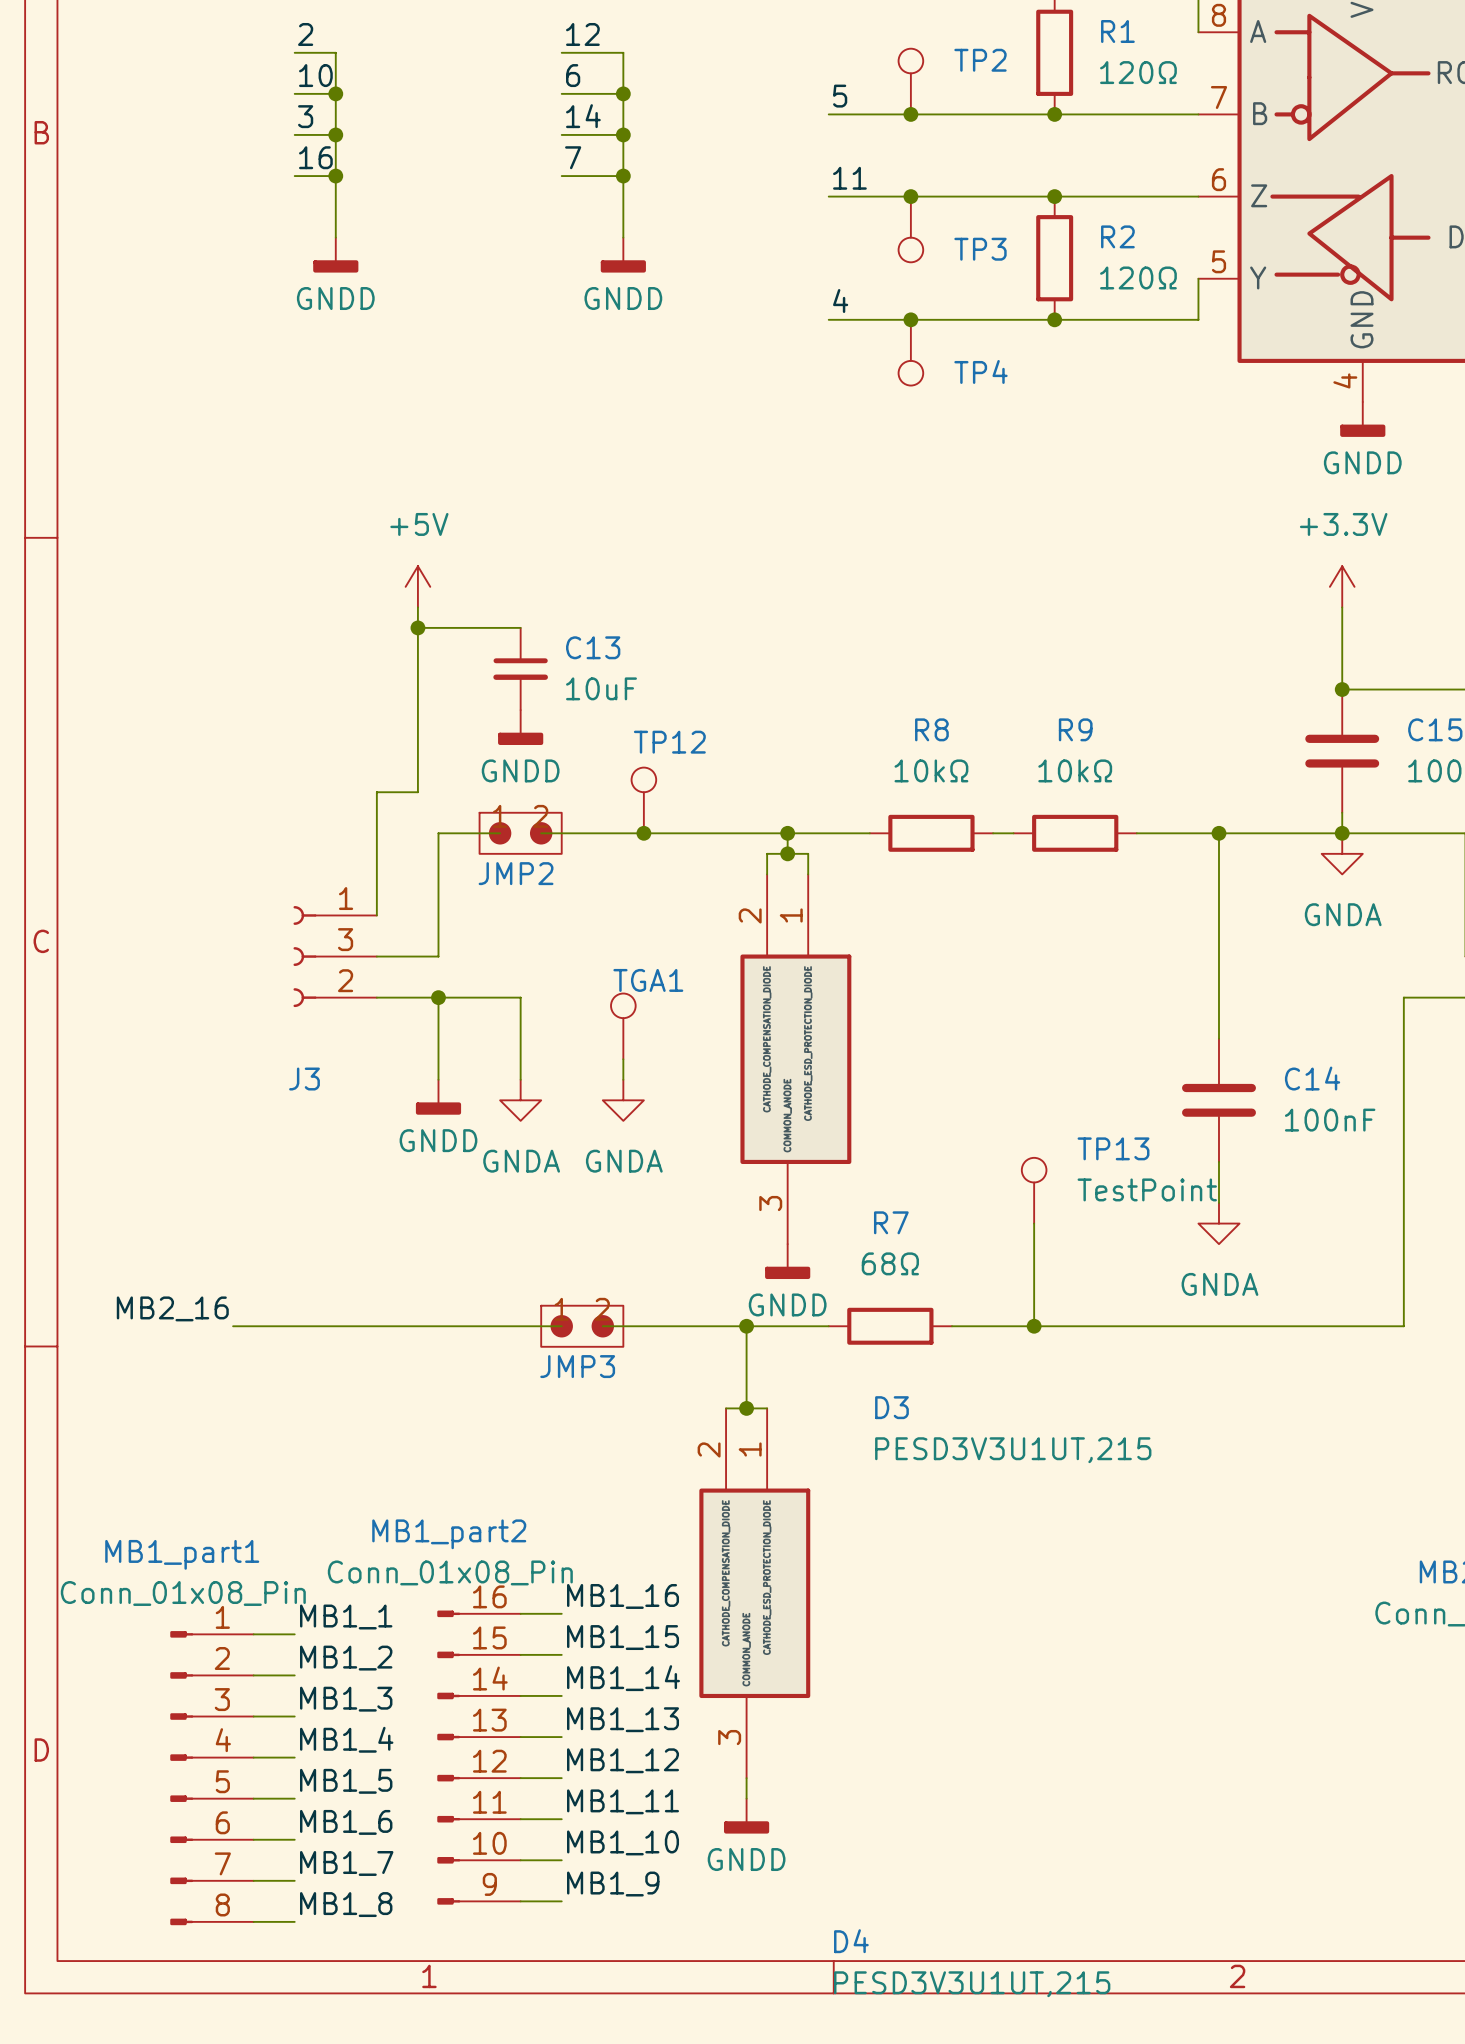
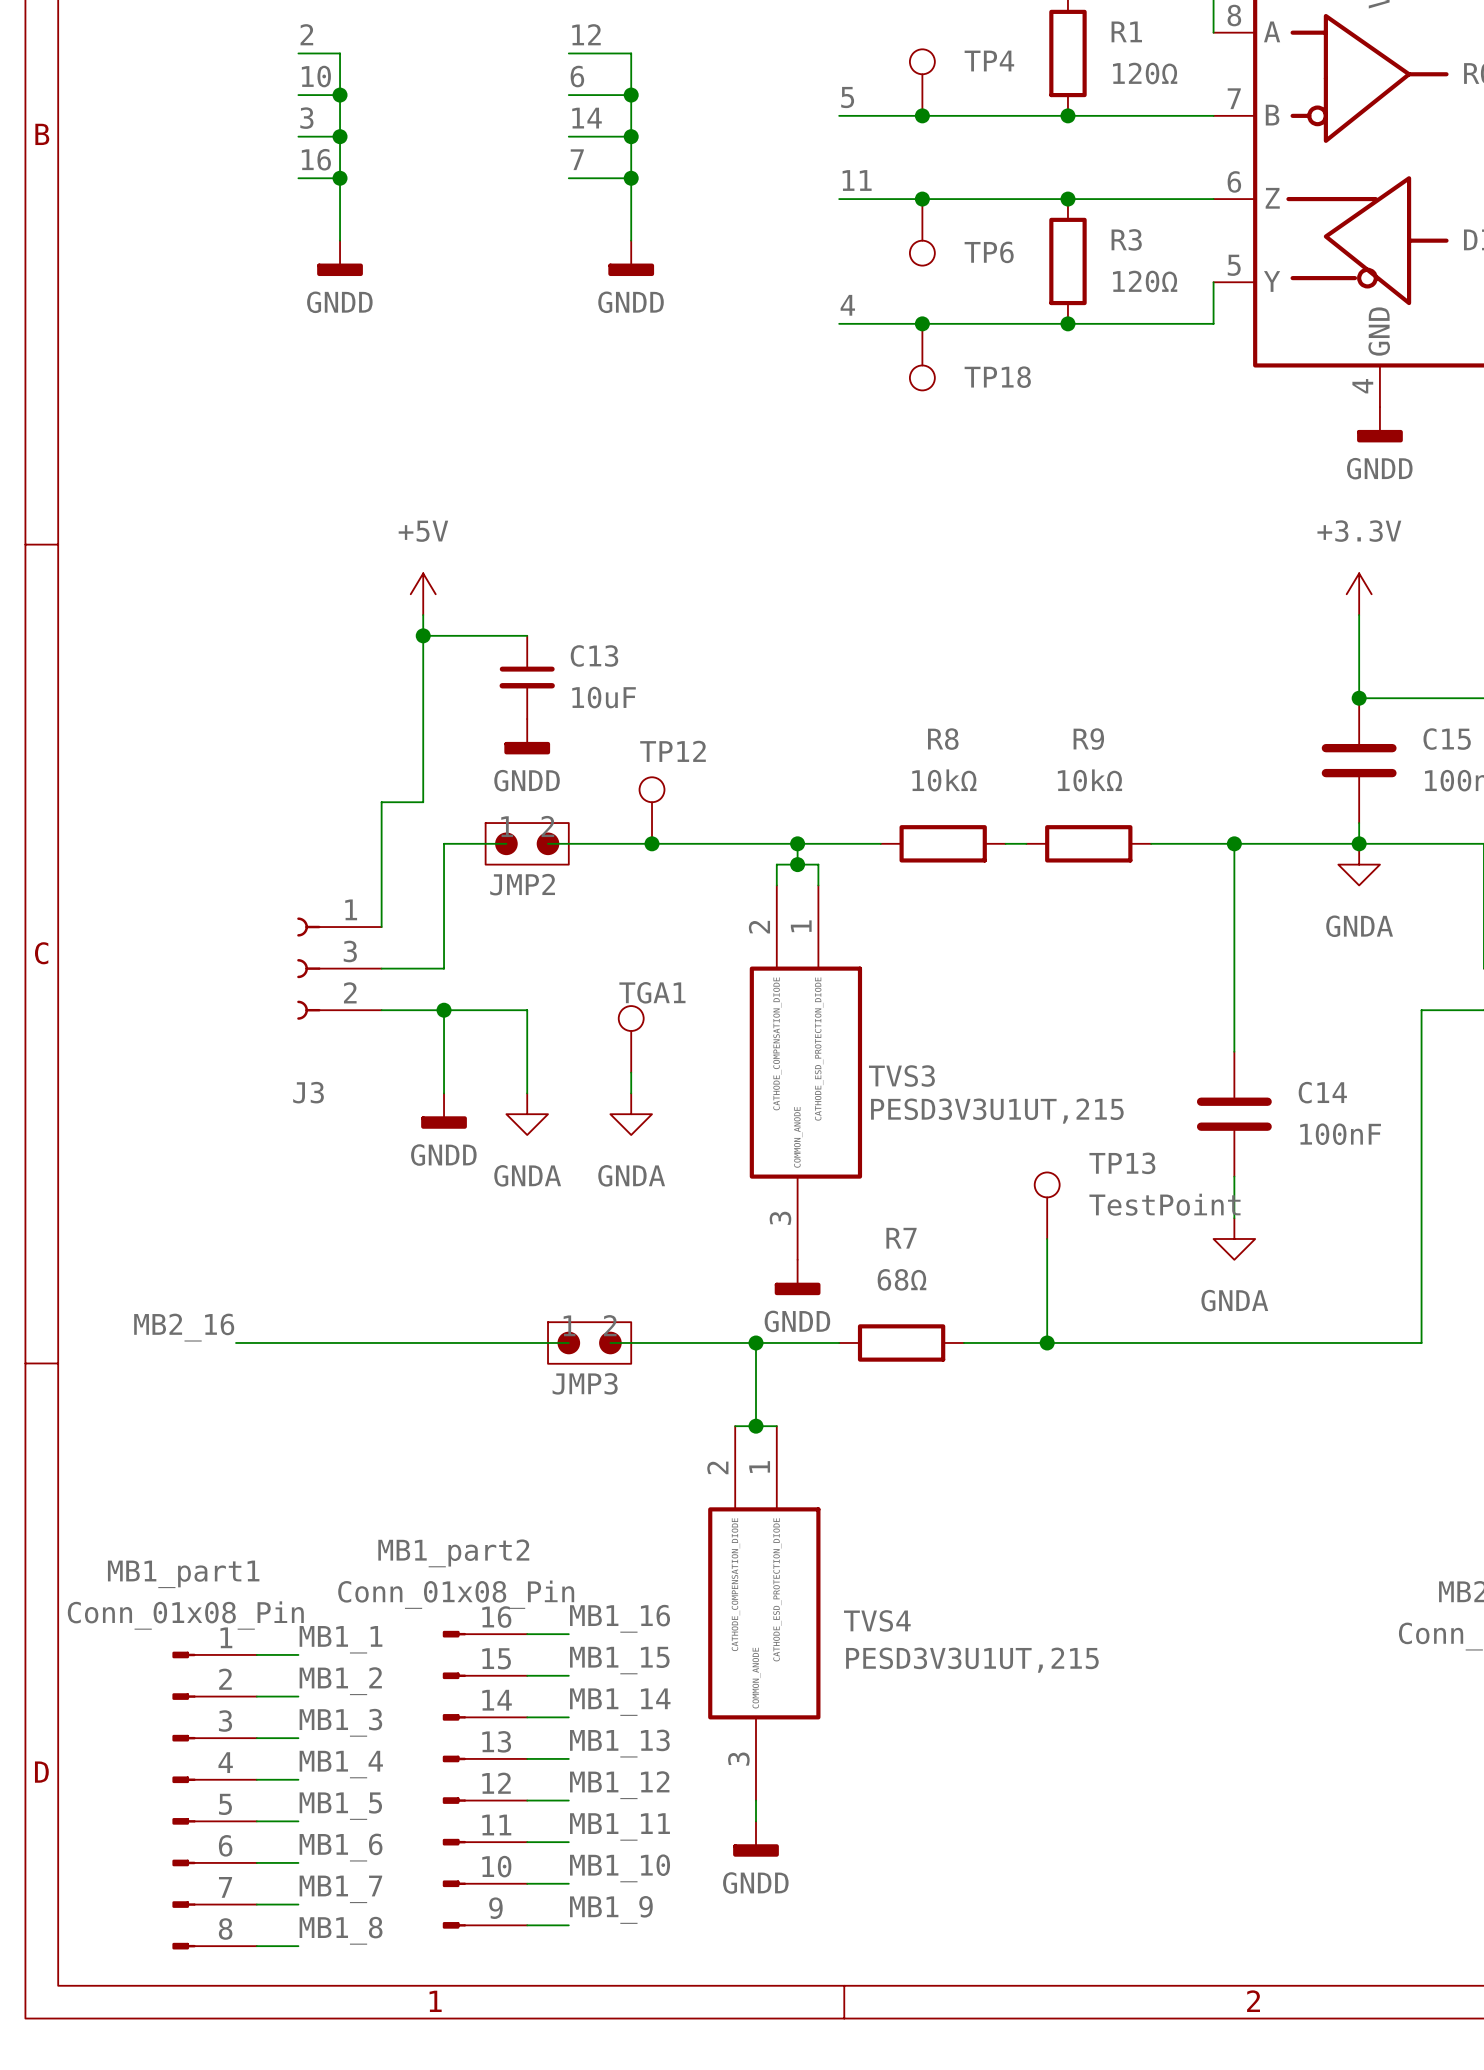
TP2 name: TP2 (980, 60) -> TP4 (989, 61)
R2 name: R2 (1117, 236) -> R3 (1126, 239)
TP3 name: TP3 (980, 249) -> TP6 (989, 252)
TP4 name: TP4 (980, 371) -> TP18 (997, 377)
D3 name: D3 (891, 1407) -> TVS3 (901, 1076)
D3 value position: PESD3V3U1UT,215 (1013, 1450) -> PESD3V3U1UT,215 (997, 1111)
D4 name: D4 (851, 1941) -> TVS4 (877, 1620)
D4 value position: PESD3V3U1UT,215 (972, 1984) -> PESD3V3U1UT,215 (972, 1660)

